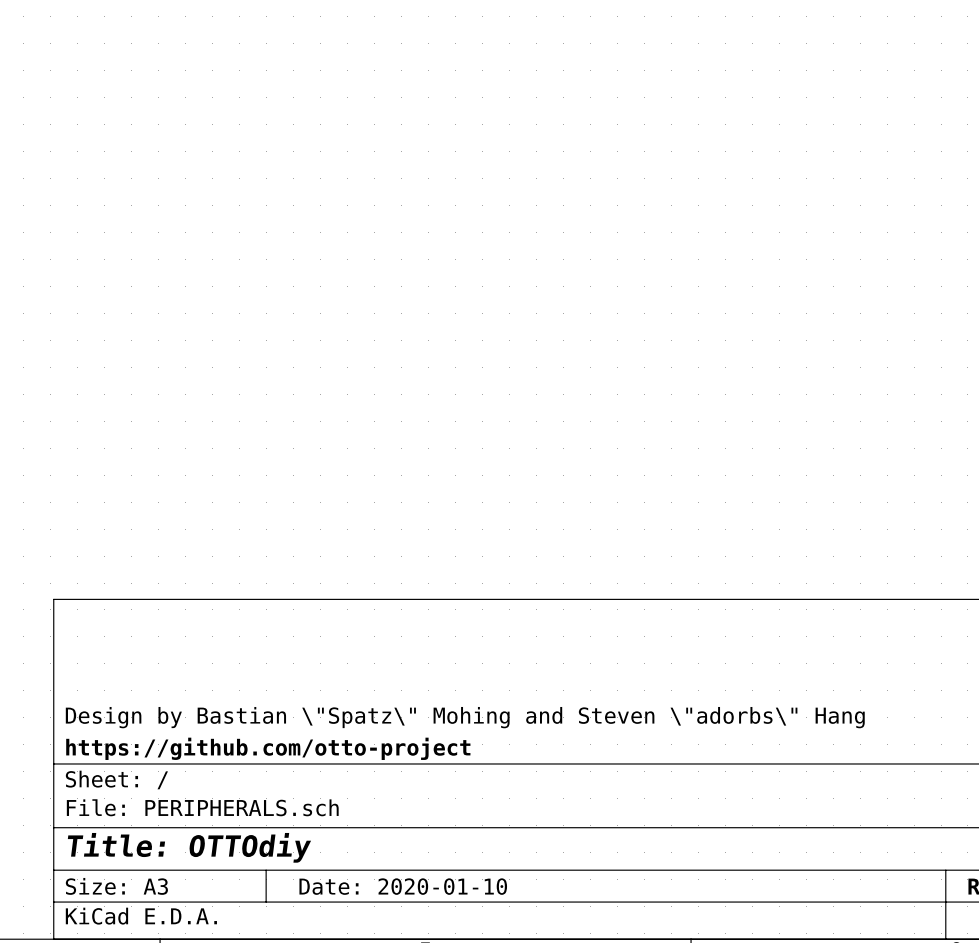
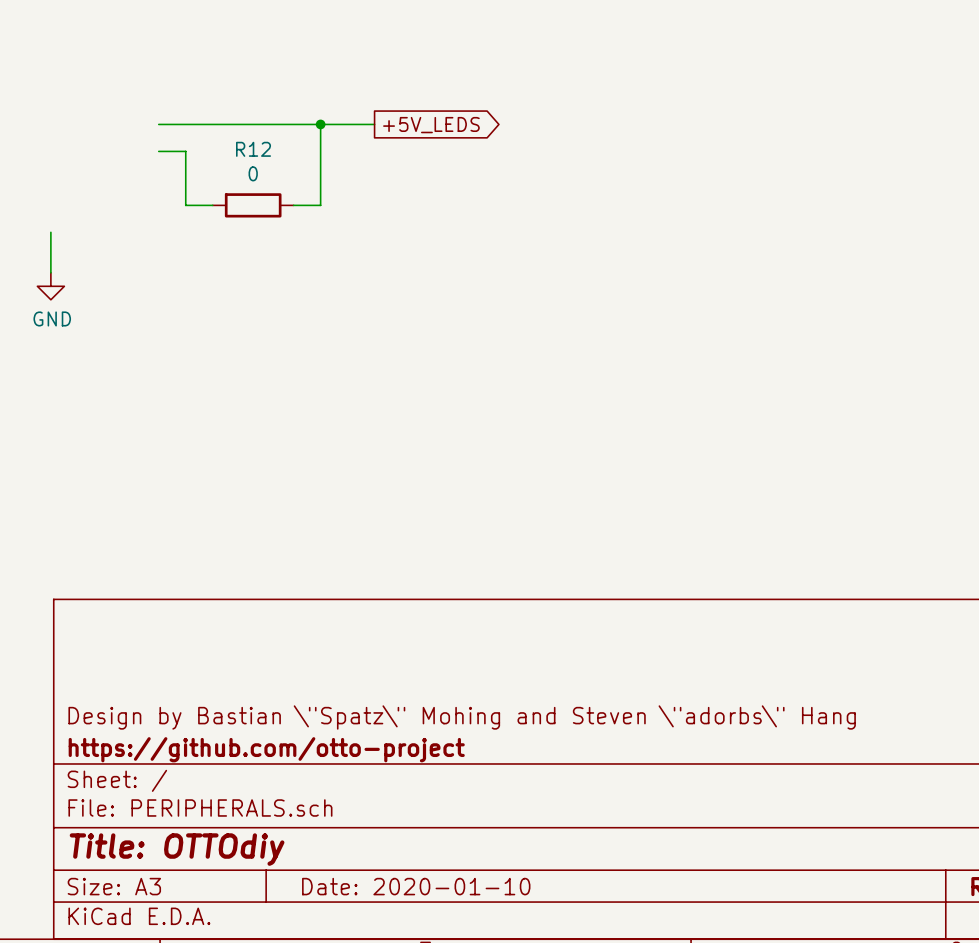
wire: none -> (158, 124) (374, 124)
wire: none -> (320, 124) (320, 205) (293, 205)
junction: none -> (320, 124)
global label: none -> +5V_LEDS (431, 125)
wire: none -> (158, 151) (185, 151) (185, 205) (212, 205)
R12: none -> 0 (253, 205)
wire: none -> (50, 232) (50, 272)
power symbol: none -> GND (50, 286)

